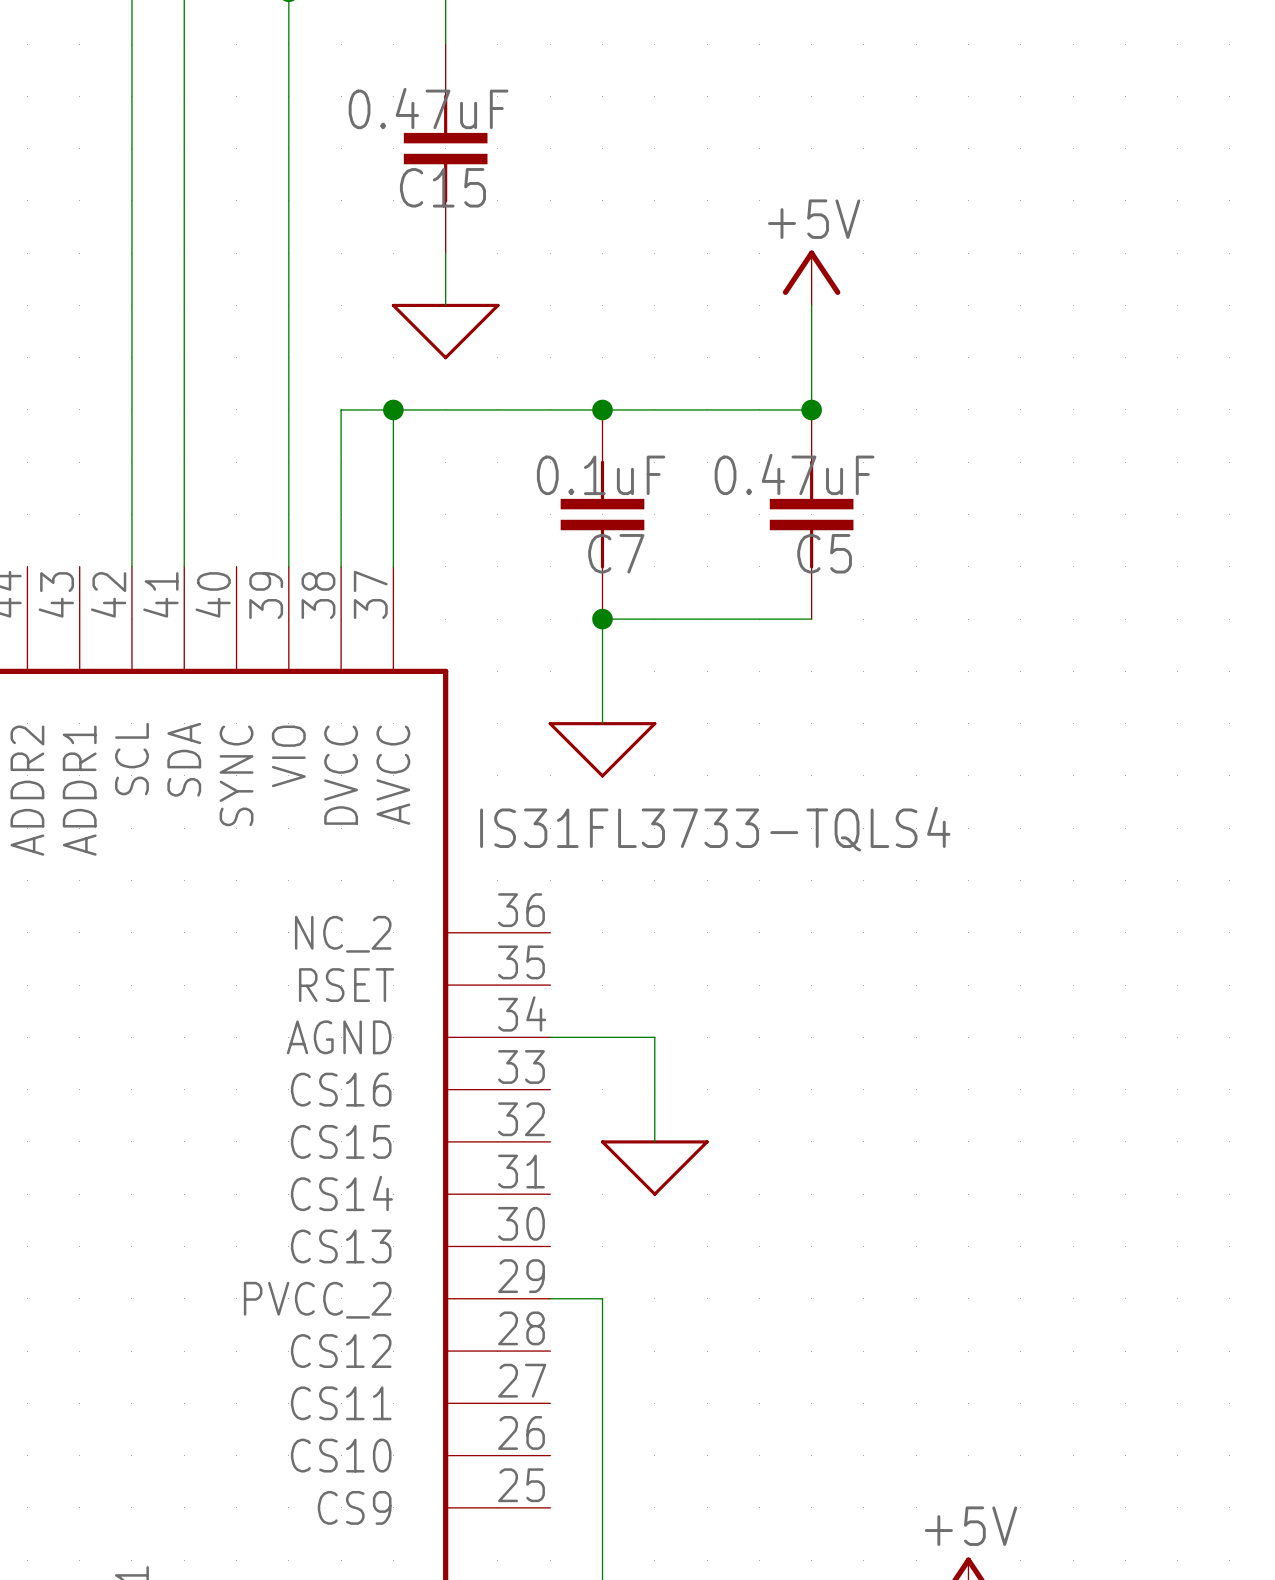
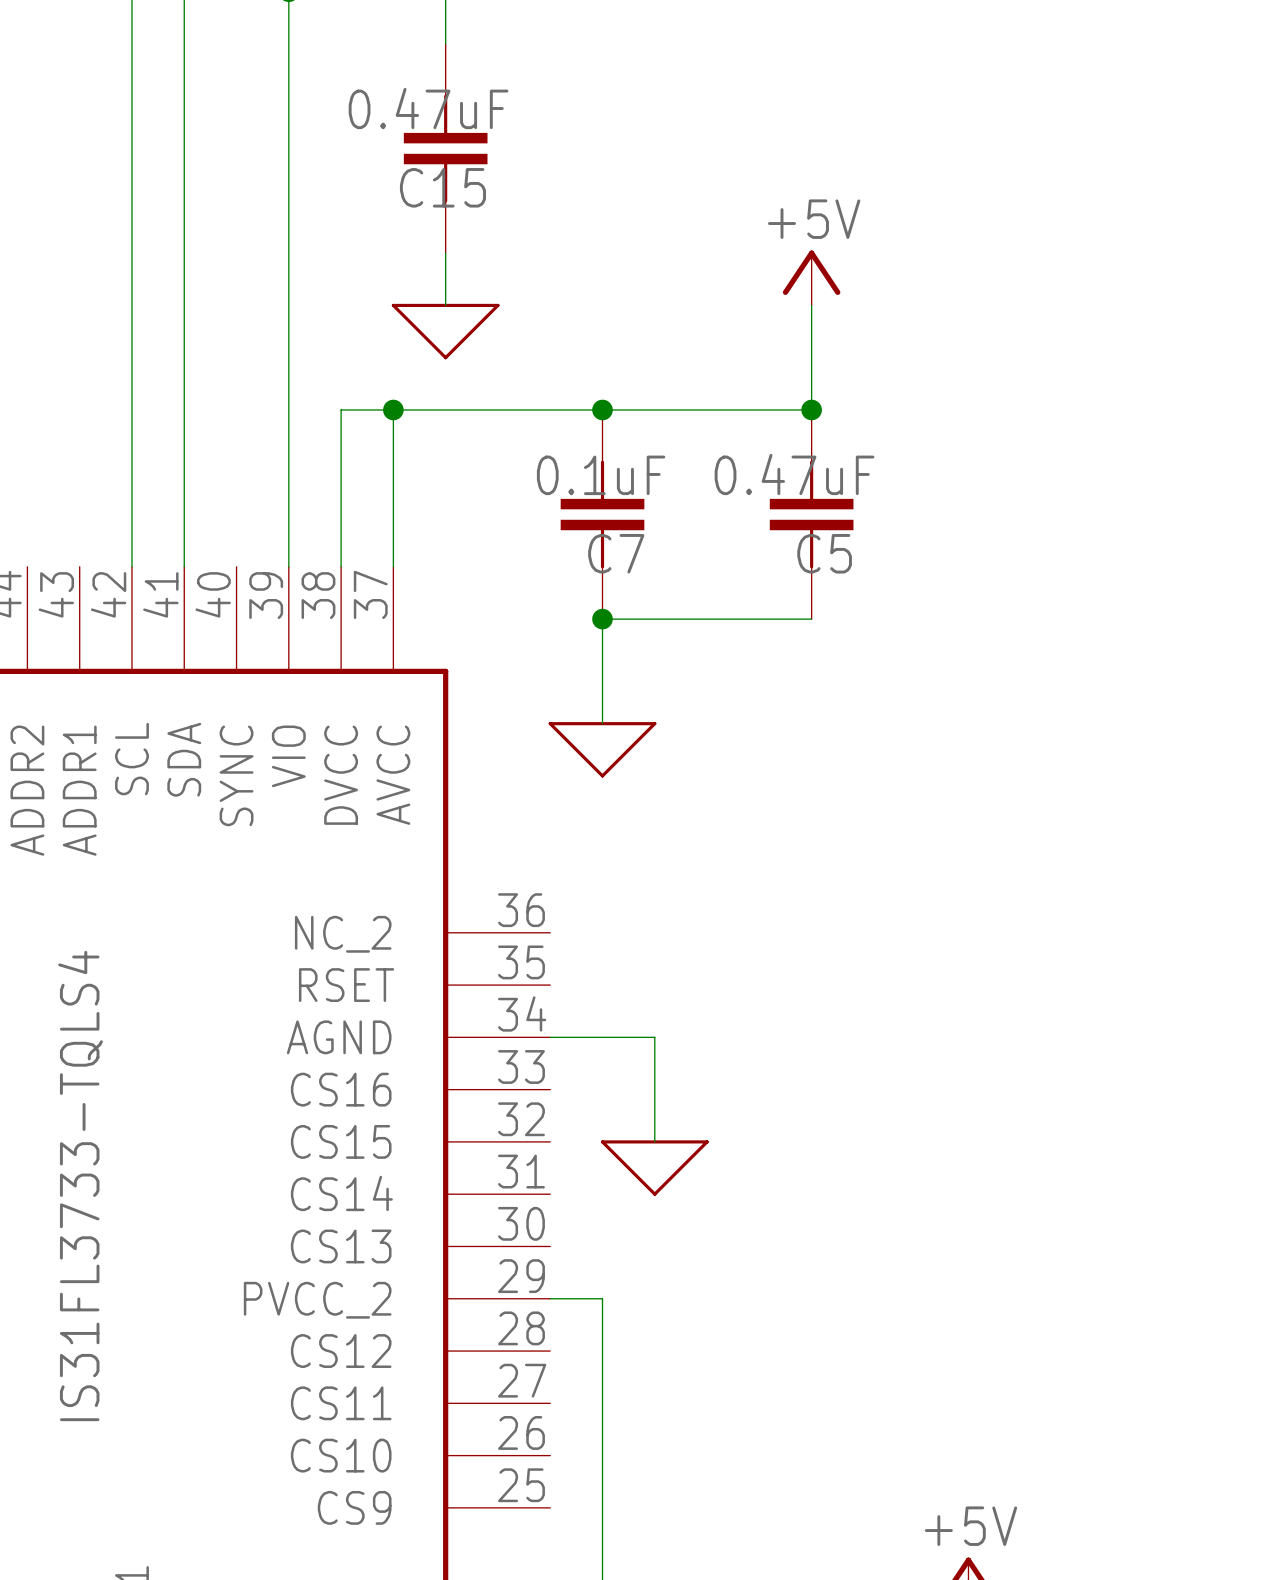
part value rotation: 0° (715, 829) -> 90° counterclockwise (80, 1185)
part value position: IS31FL3733-TQLS4 (715, 829) -> IS31FL3733-TQLS4 (80, 1185)

